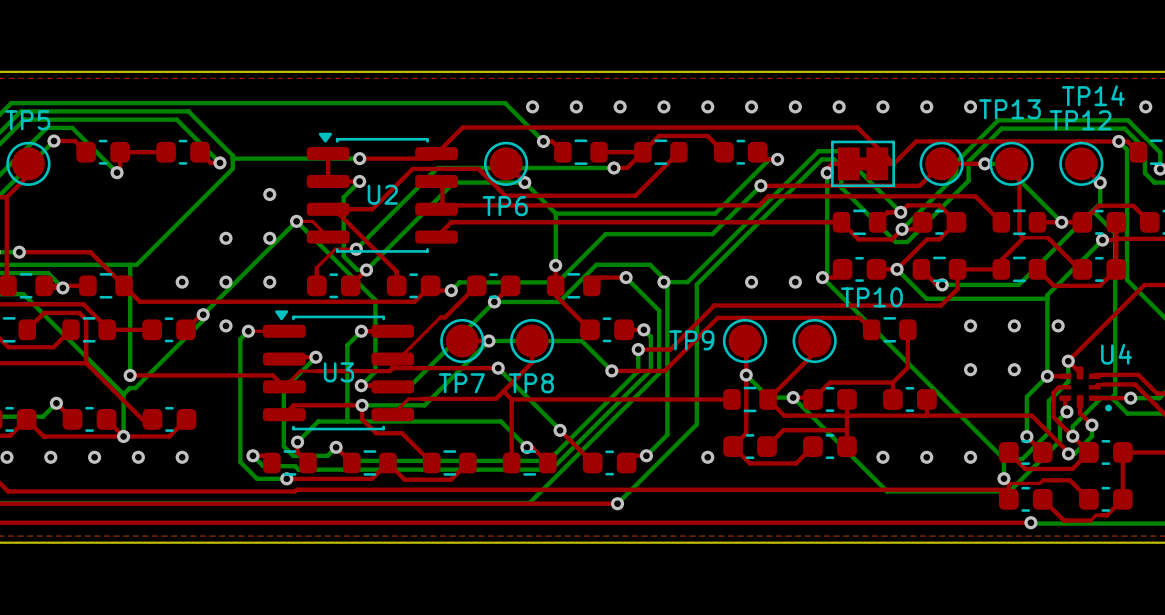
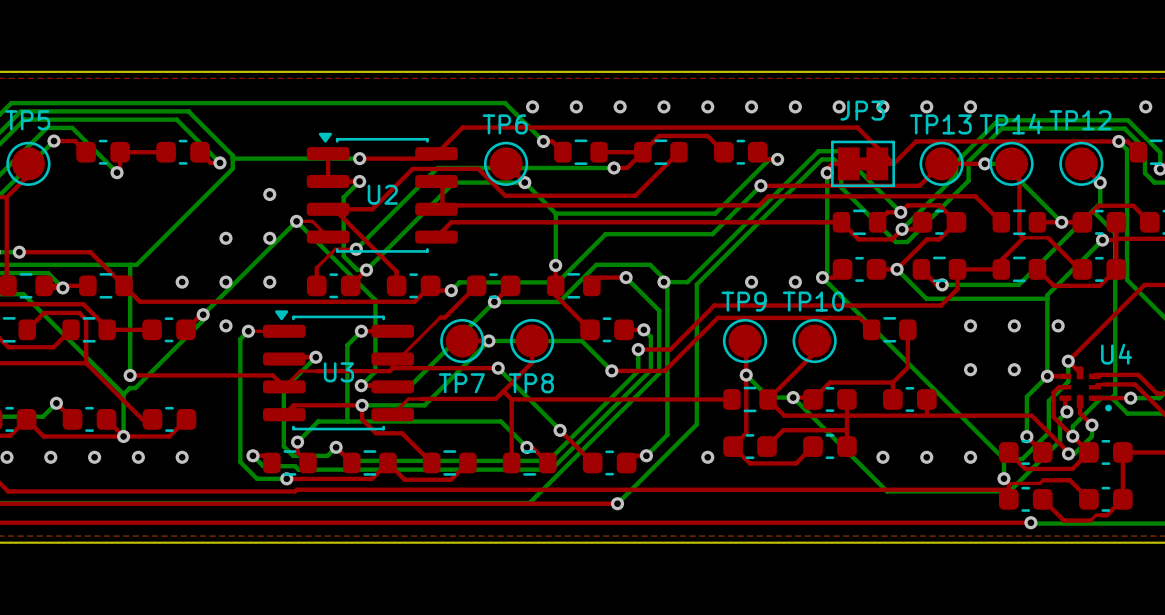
text: TP14 (1093, 95) -> none
text: TP13 (1009, 109) -> TP14 (1011, 124)
text: none -> JP3 (862, 110)
text: none -> TP13 (940, 124)
text position: TP6 (505, 206) -> TP6 (505, 124)
text position: TP10 (871, 297) -> TP10 (813, 301)
text position: TP9 (691, 340) -> TP9 (744, 301)

